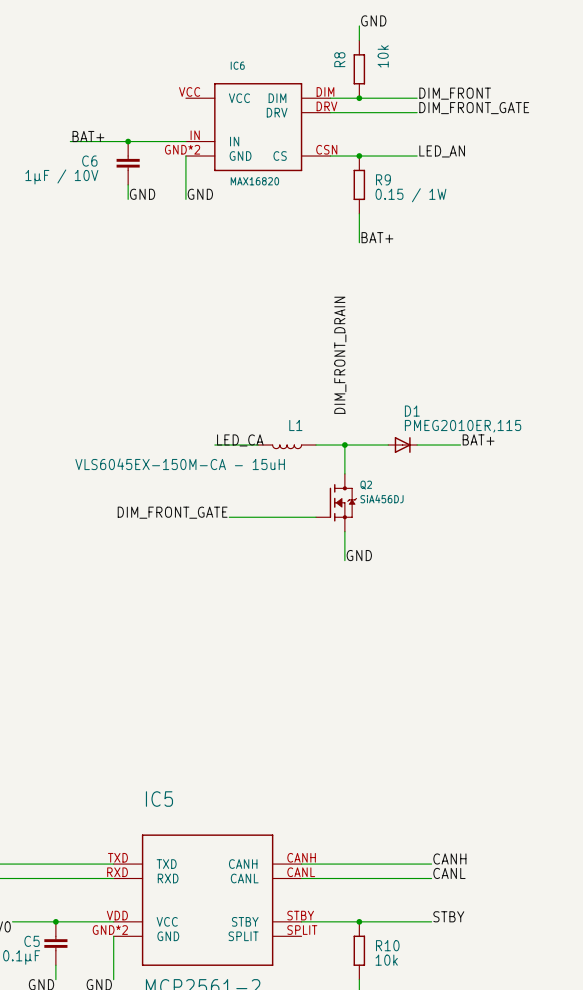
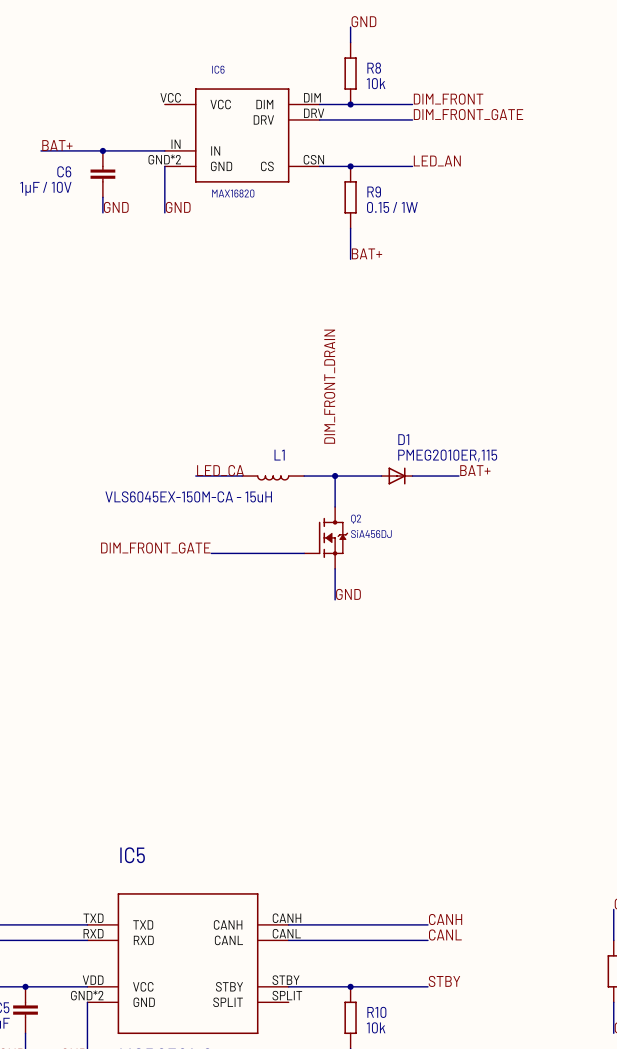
R8 value rotation: 0° (383, 56) -> 90° clockwise (376, 83)
R8 name rotation: 0° (339, 59) -> 90° clockwise (374, 68)
R8 name position: R8 (339, 59) -> R8 (374, 68)

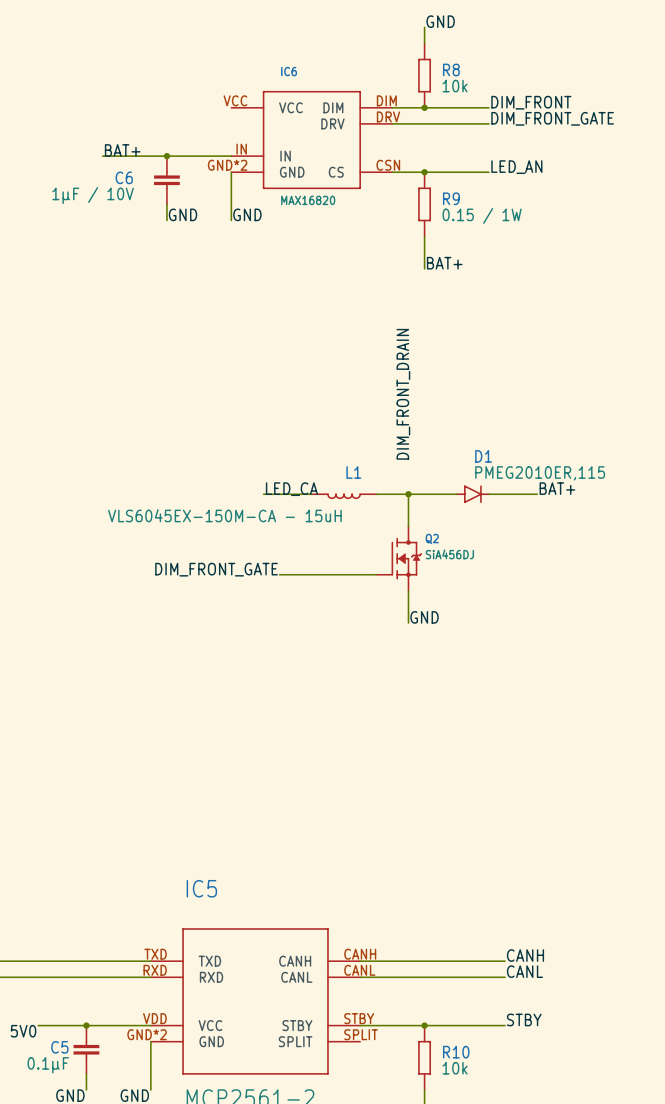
D1 symbol: [381, 467, 413, 485] -> [455, 485, 490, 504]

